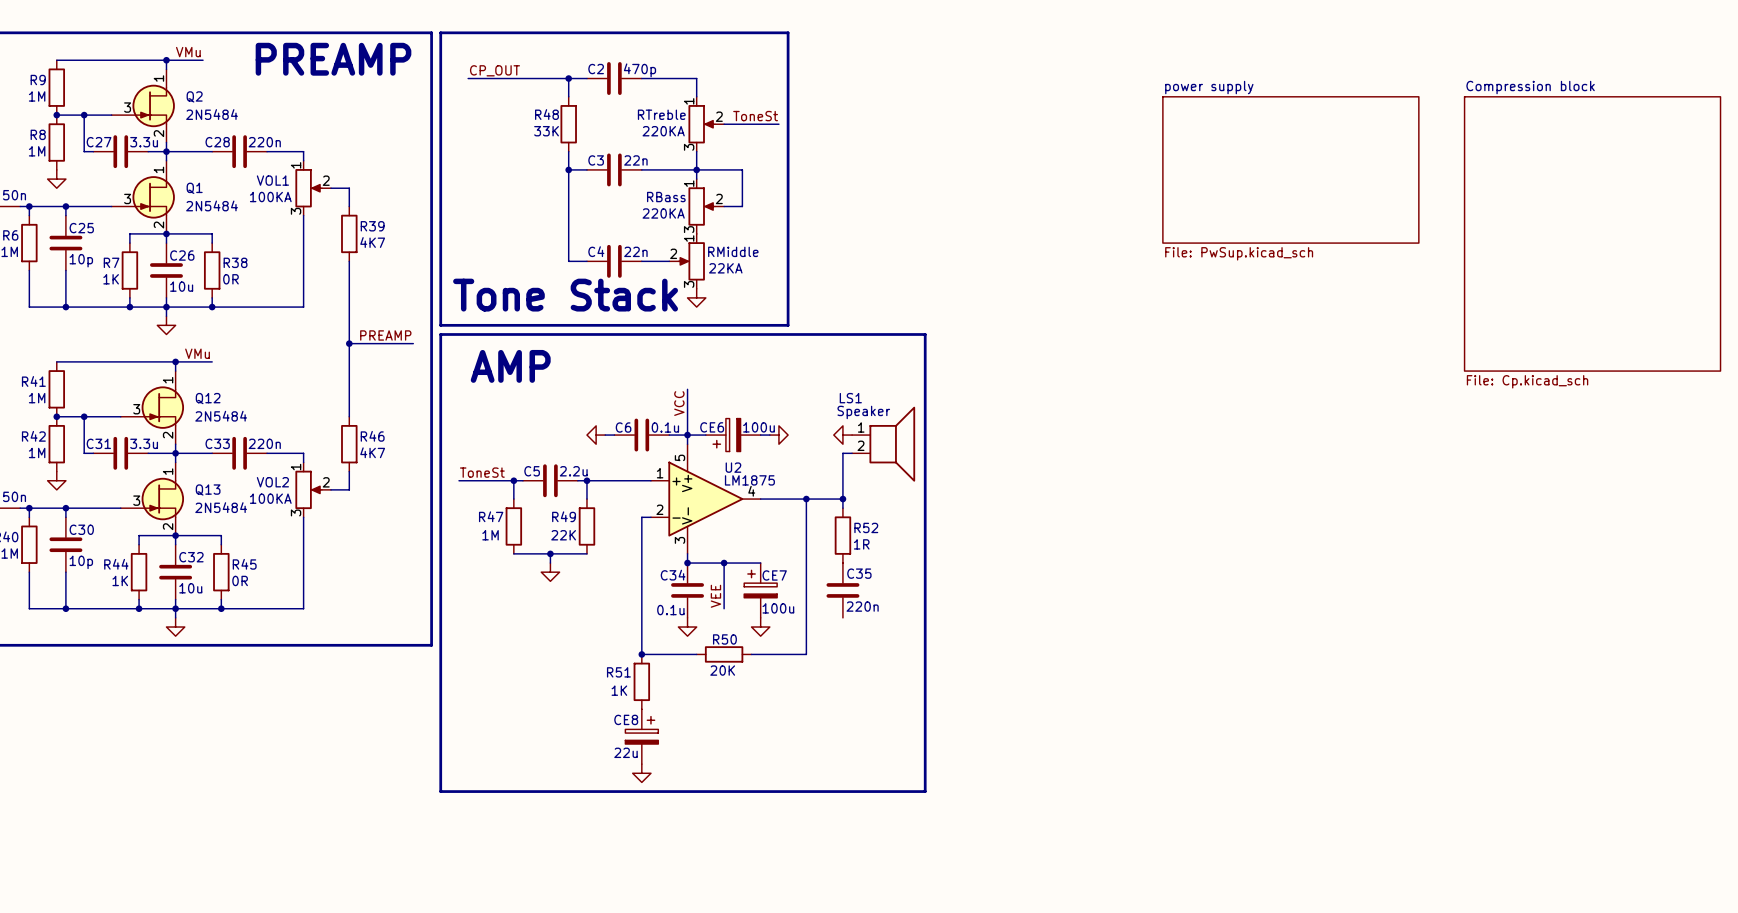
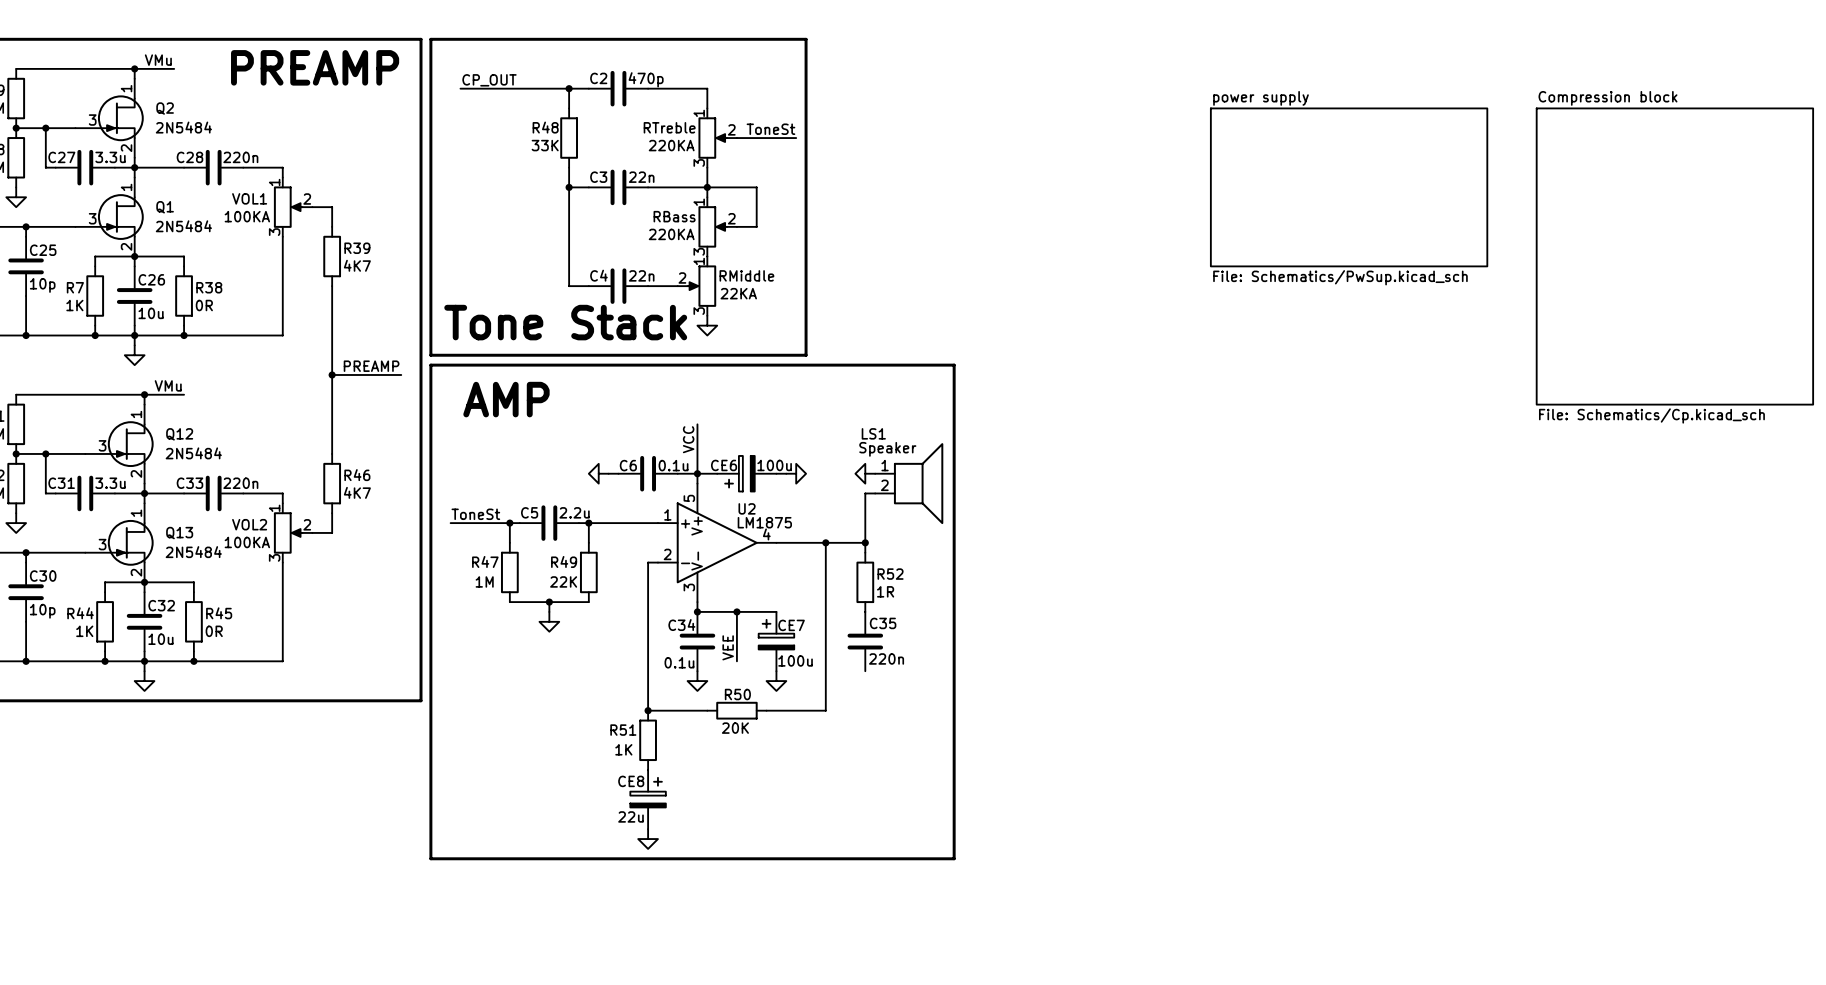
sheet power supply value: File: PwSup.kicad_sch (1239, 253) -> File: Schematics/PwSup.kicad_sch (1340, 277)
sheet Compression block value: File: Cp.kicad_sch (1527, 381) -> File: Schematics/Cp.kicad_sch (1651, 415)

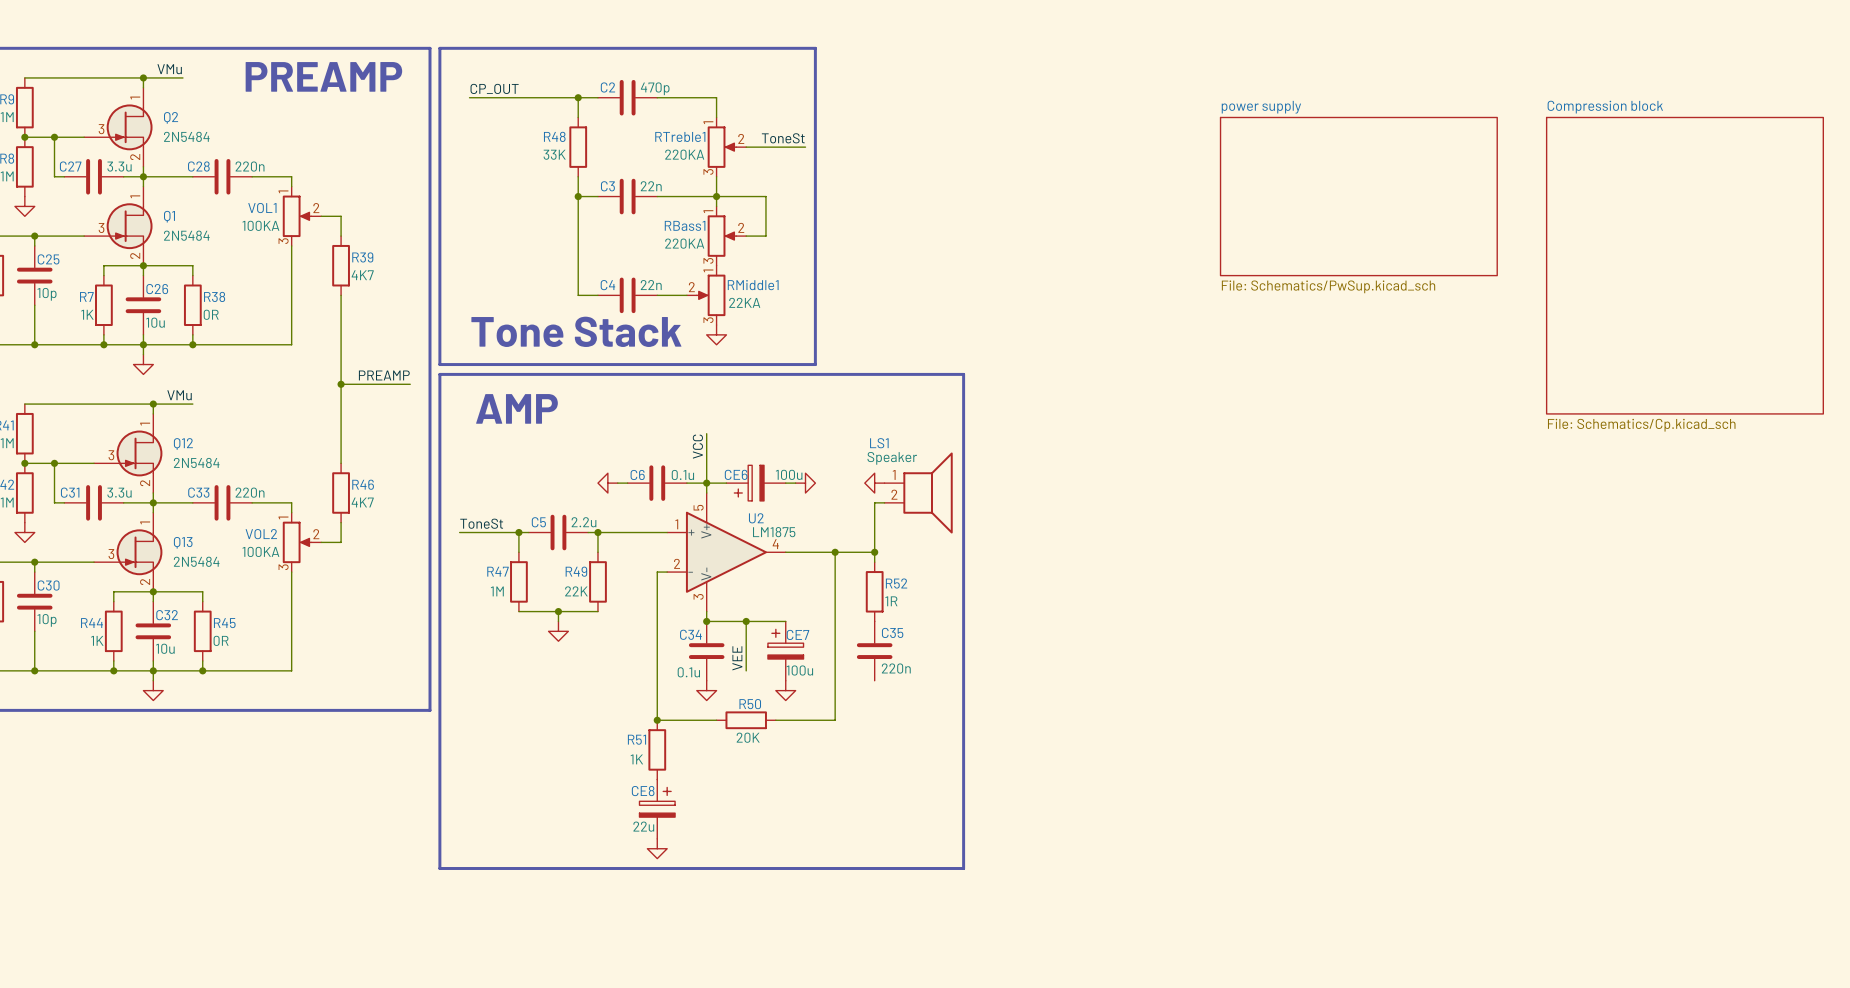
RTreble name: RTreble (669, 127) -> RTreble1 (680, 136)
RBass name: RBass (674, 216) -> RBass1 (685, 225)
RMiddle name: RMiddle (746, 275) -> RMiddle1 (753, 285)

